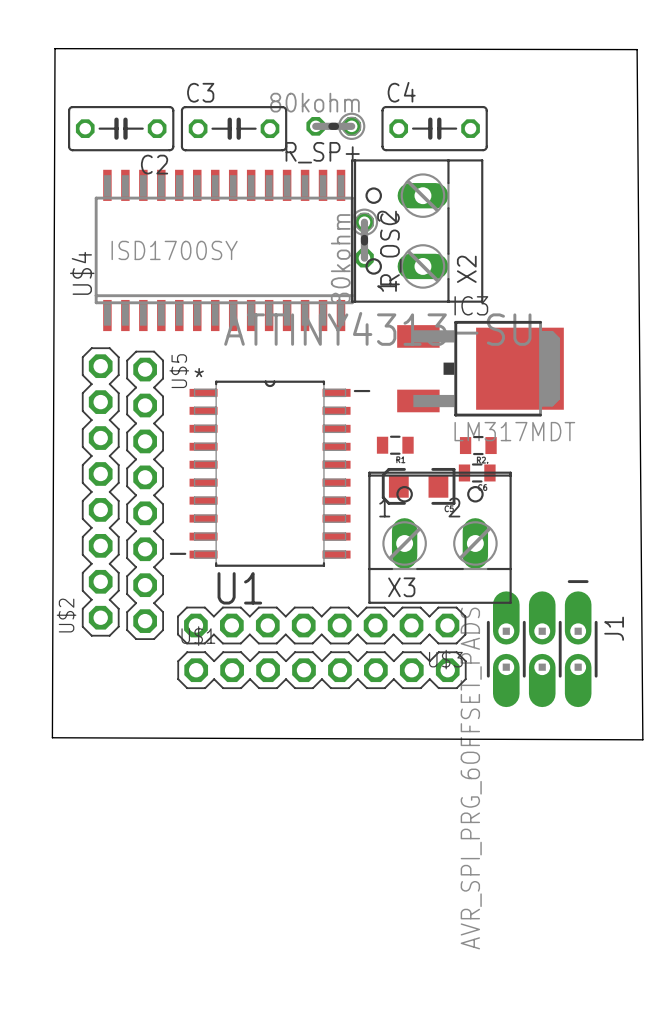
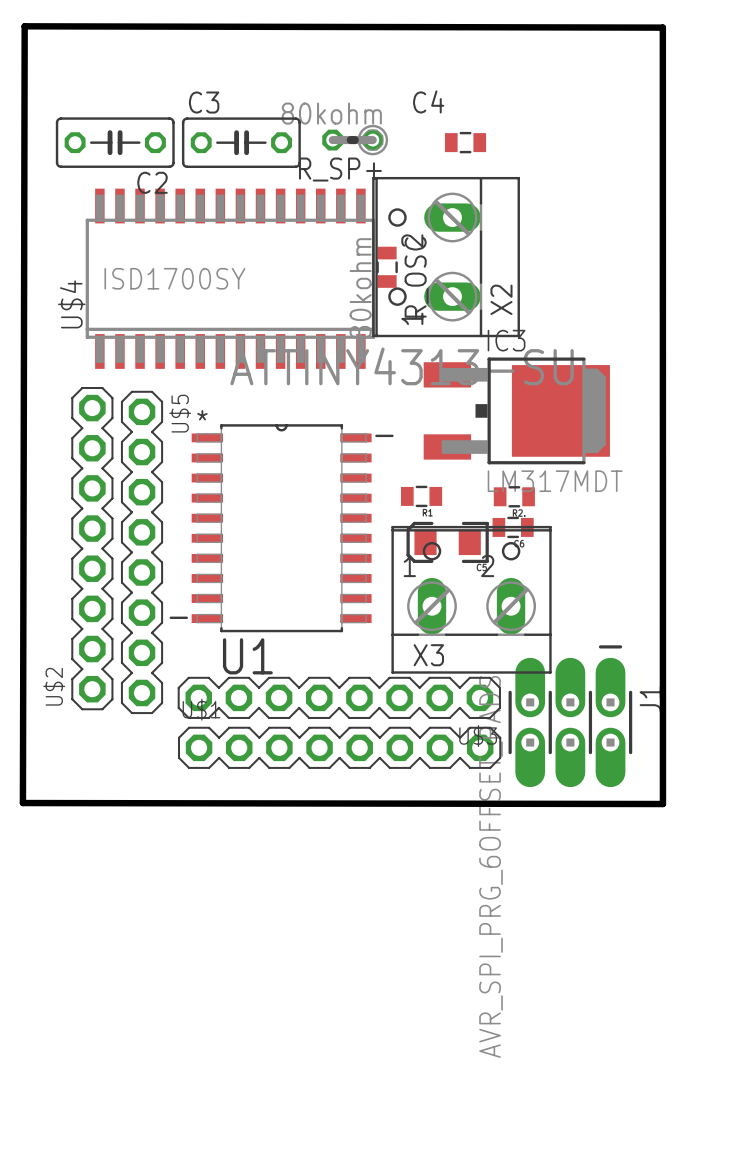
board edge: (55, 48) (637, 49) (642, 739) (52, 737) (55, 48) -> (24, 26) (22, 803) (662, 804) (662, 27) (24, 26)
C4 footprint: [381, 105, 488, 152] -> [444, 131, 487, 154]
R_OSC footprint: [350, 208, 379, 268] -> [376, 246, 398, 288]
J1 position: (542, 643) -> (570, 716)

